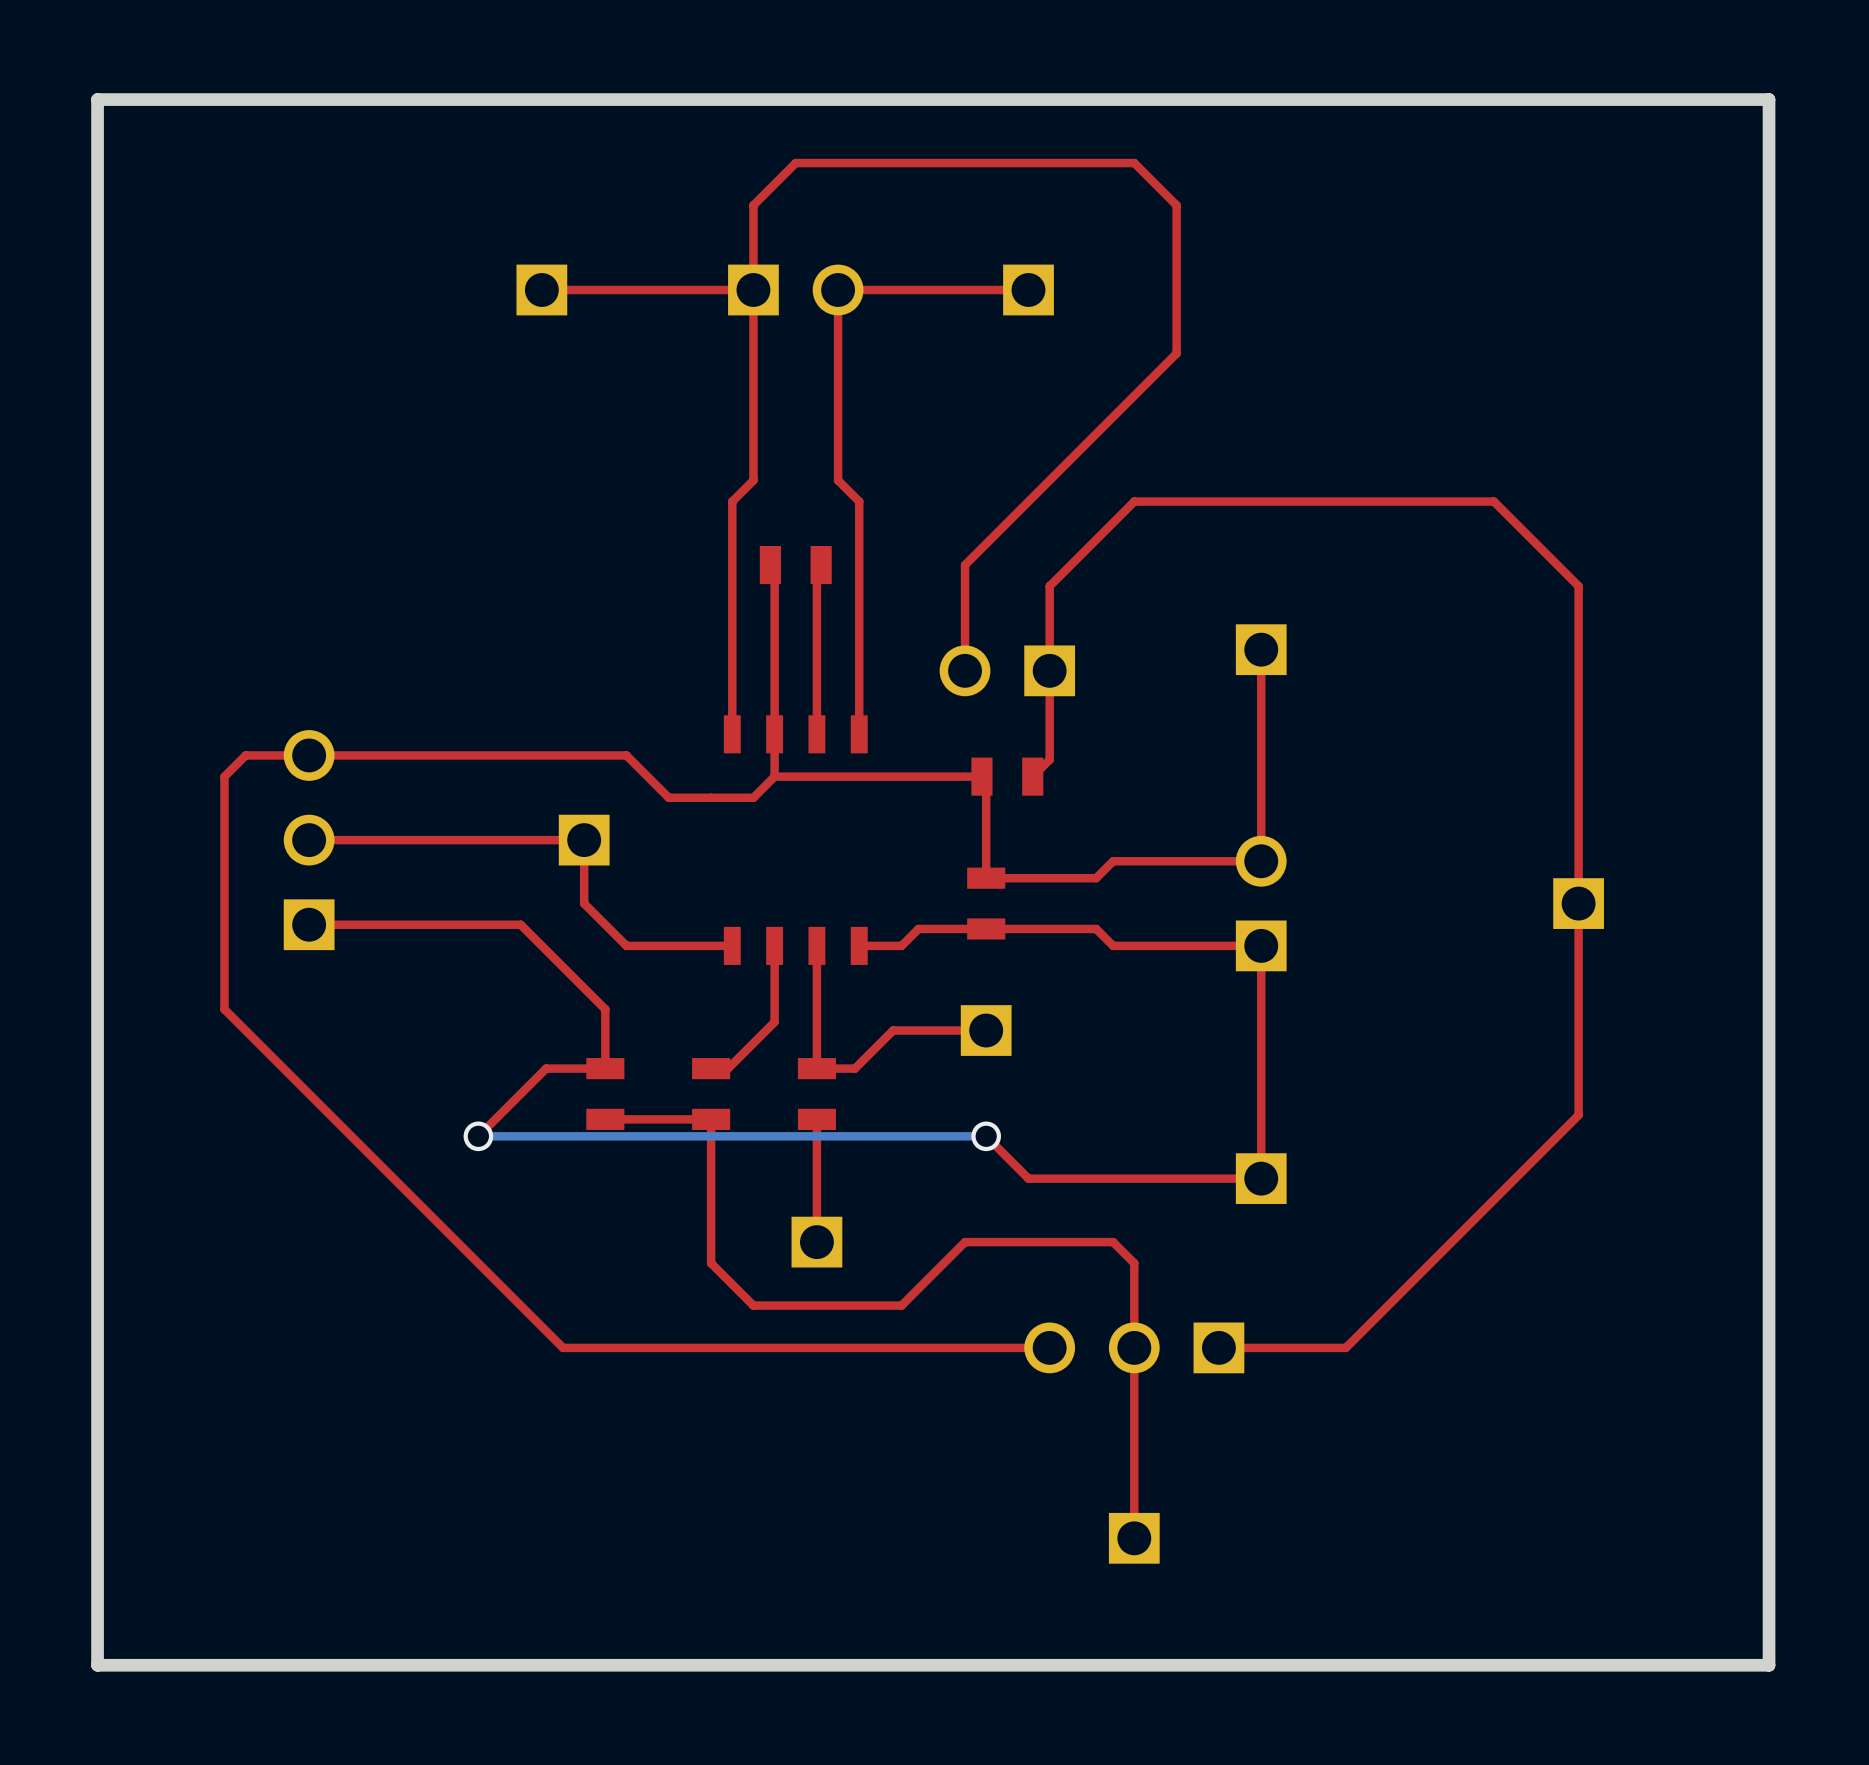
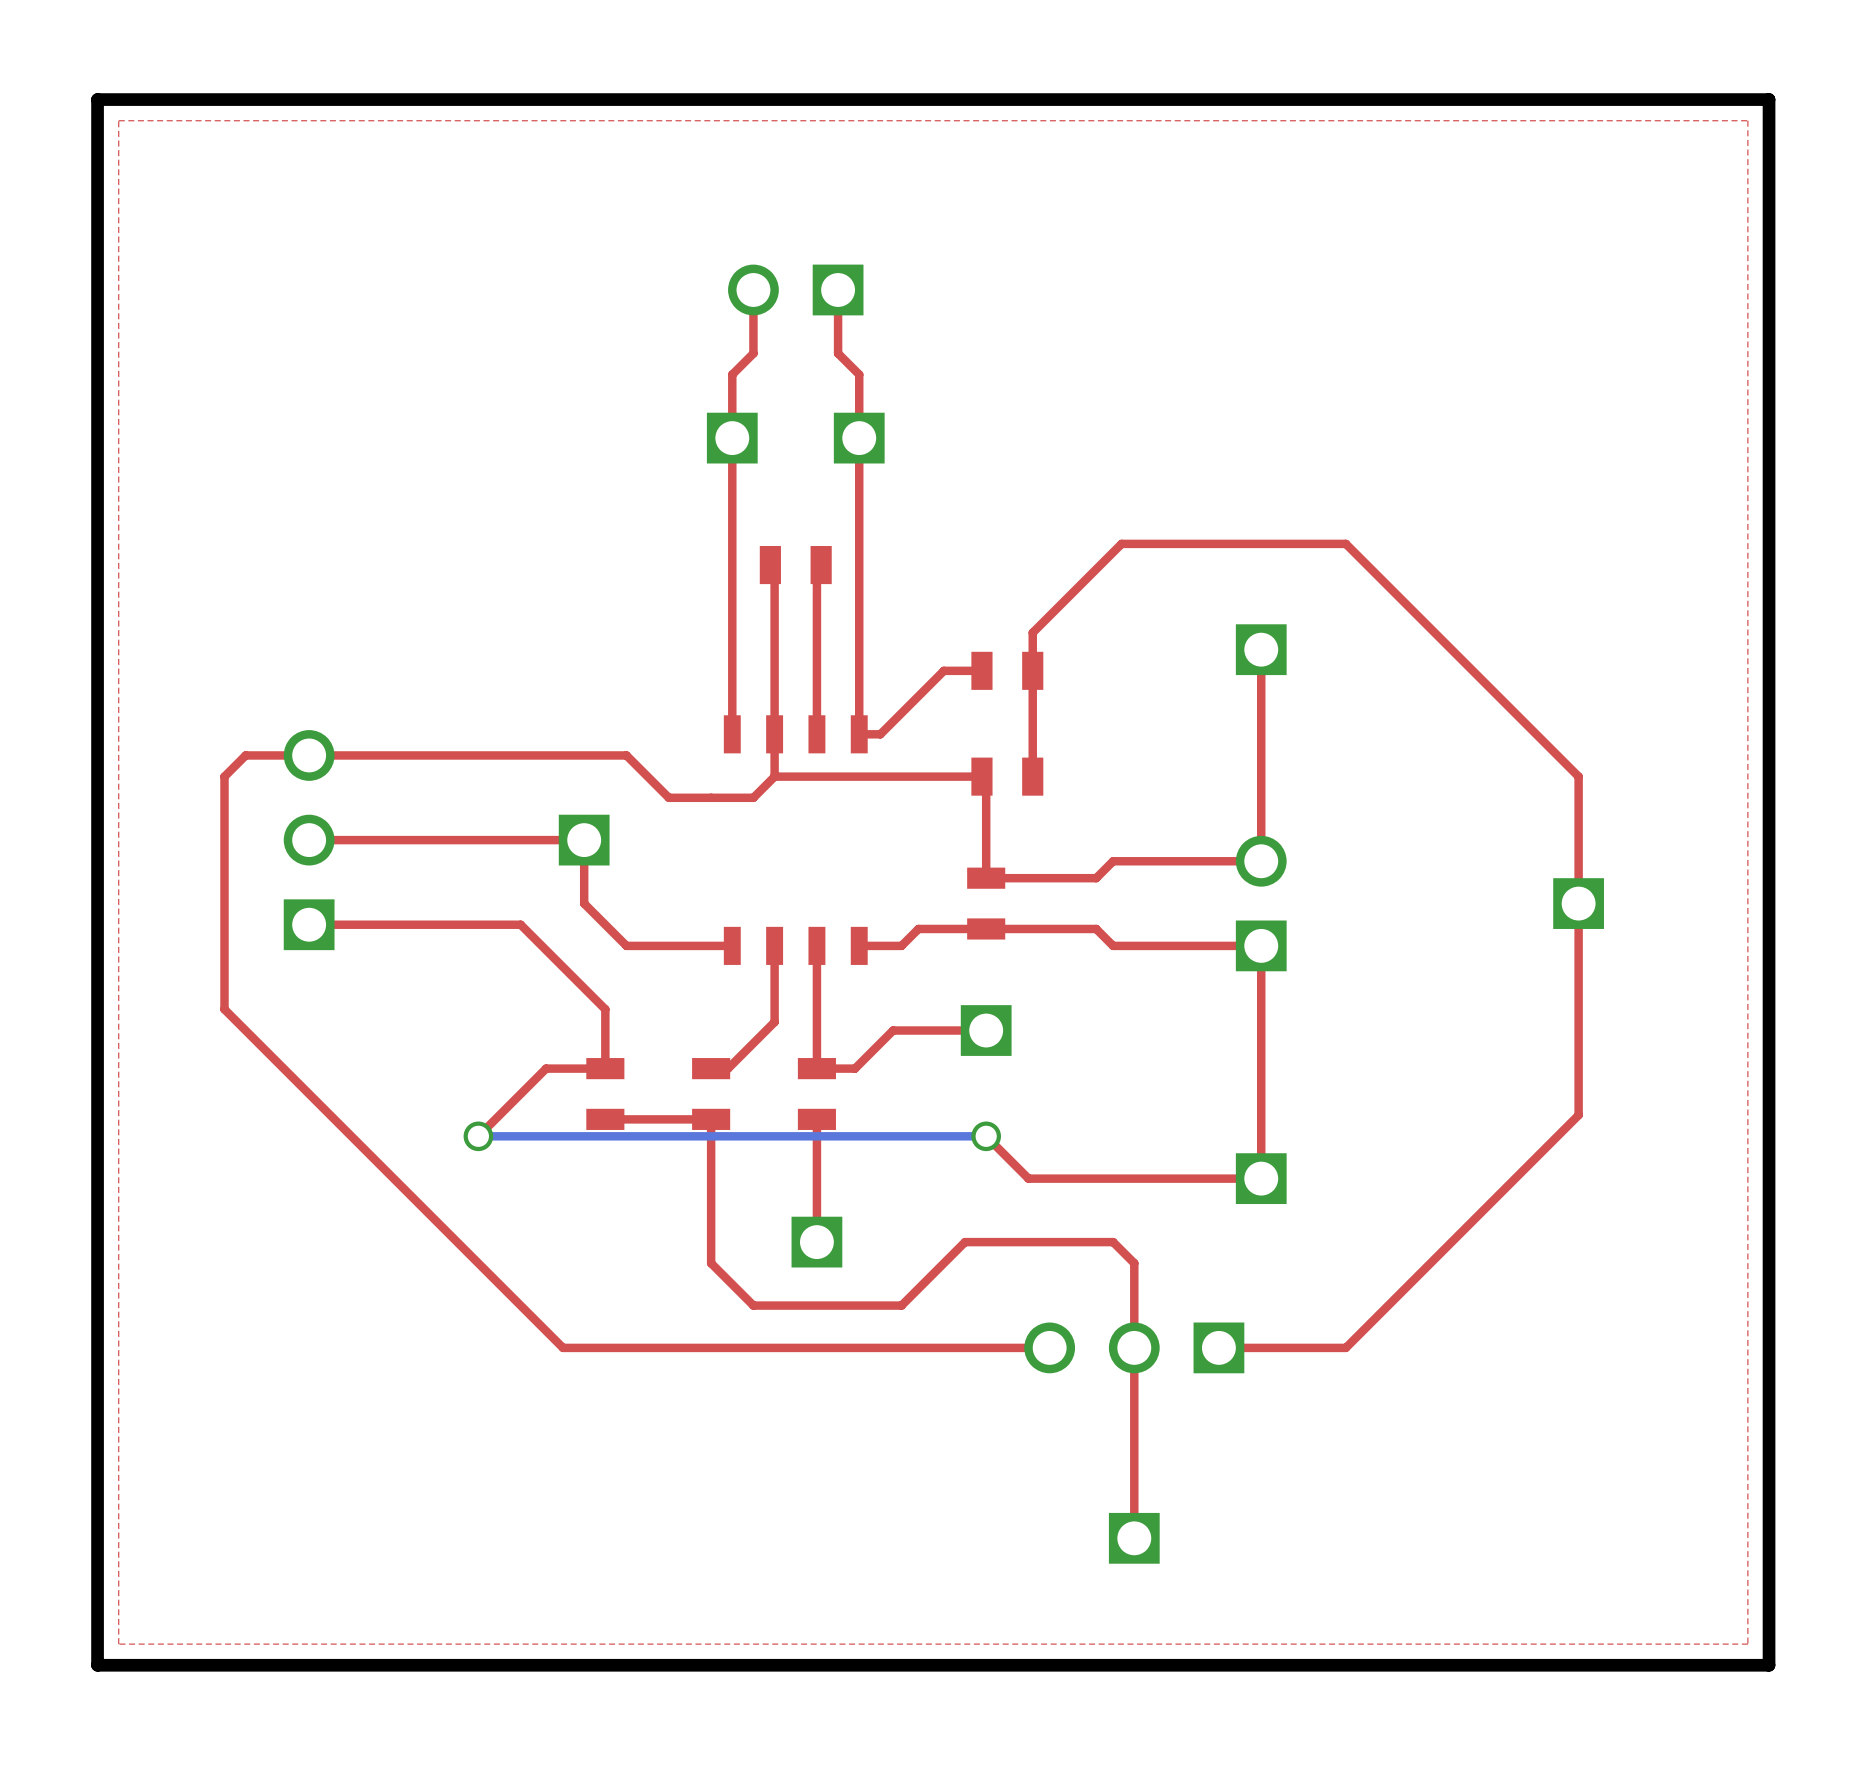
top zone outline: none -> (1747, 120) (118, 120) (118, 1644) (1747, 1644) (1747, 120)
top track: (541, 289) (753, 289) (753, 205) (795, 163) (1134, 163) (1176, 205) (1176, 353) (965, 565) (965, 670) -> none
part: (541, 289) -> none
part rotation: 0° (795, 289) -> 180° (795, 289)
top track: (1028, 289) (838, 289) -> none
part: (1028, 289) -> none
top track: (753, 353) (753, 480) (732, 501) -> (753, 353) (732, 374) (732, 501)
top track: (838, 353) (838, 480) (859, 501) -> (838, 353) (859, 374) (859, 501)
part: none -> (732, 438)
part: none -> (859, 438)
part footprint: [939, 645, 1076, 697] -> [971, 651, 1044, 690]
top track: none -> (981, 670) (943, 670) (880, 734) (859, 734)
top track: (1578, 776) (1578, 586) (1493, 501) (1134, 501) (1049, 586) (1049, 759) (1032, 776) -> (1578, 776) (1345, 543) (1121, 543) (1032, 632) (1032, 776)

